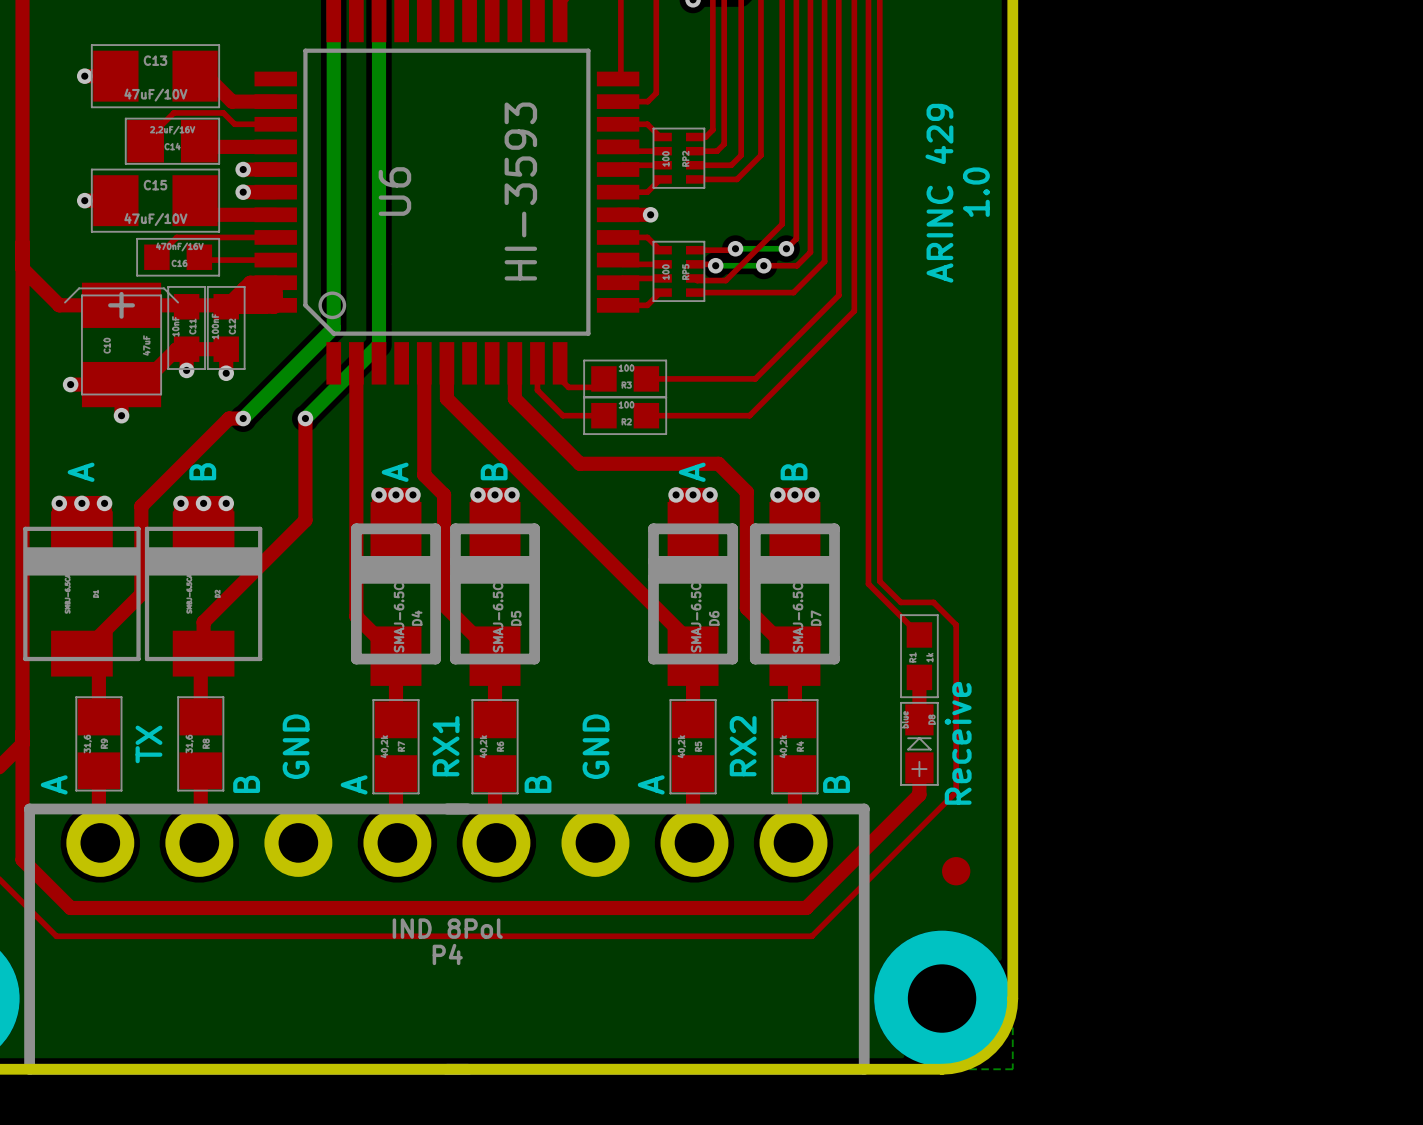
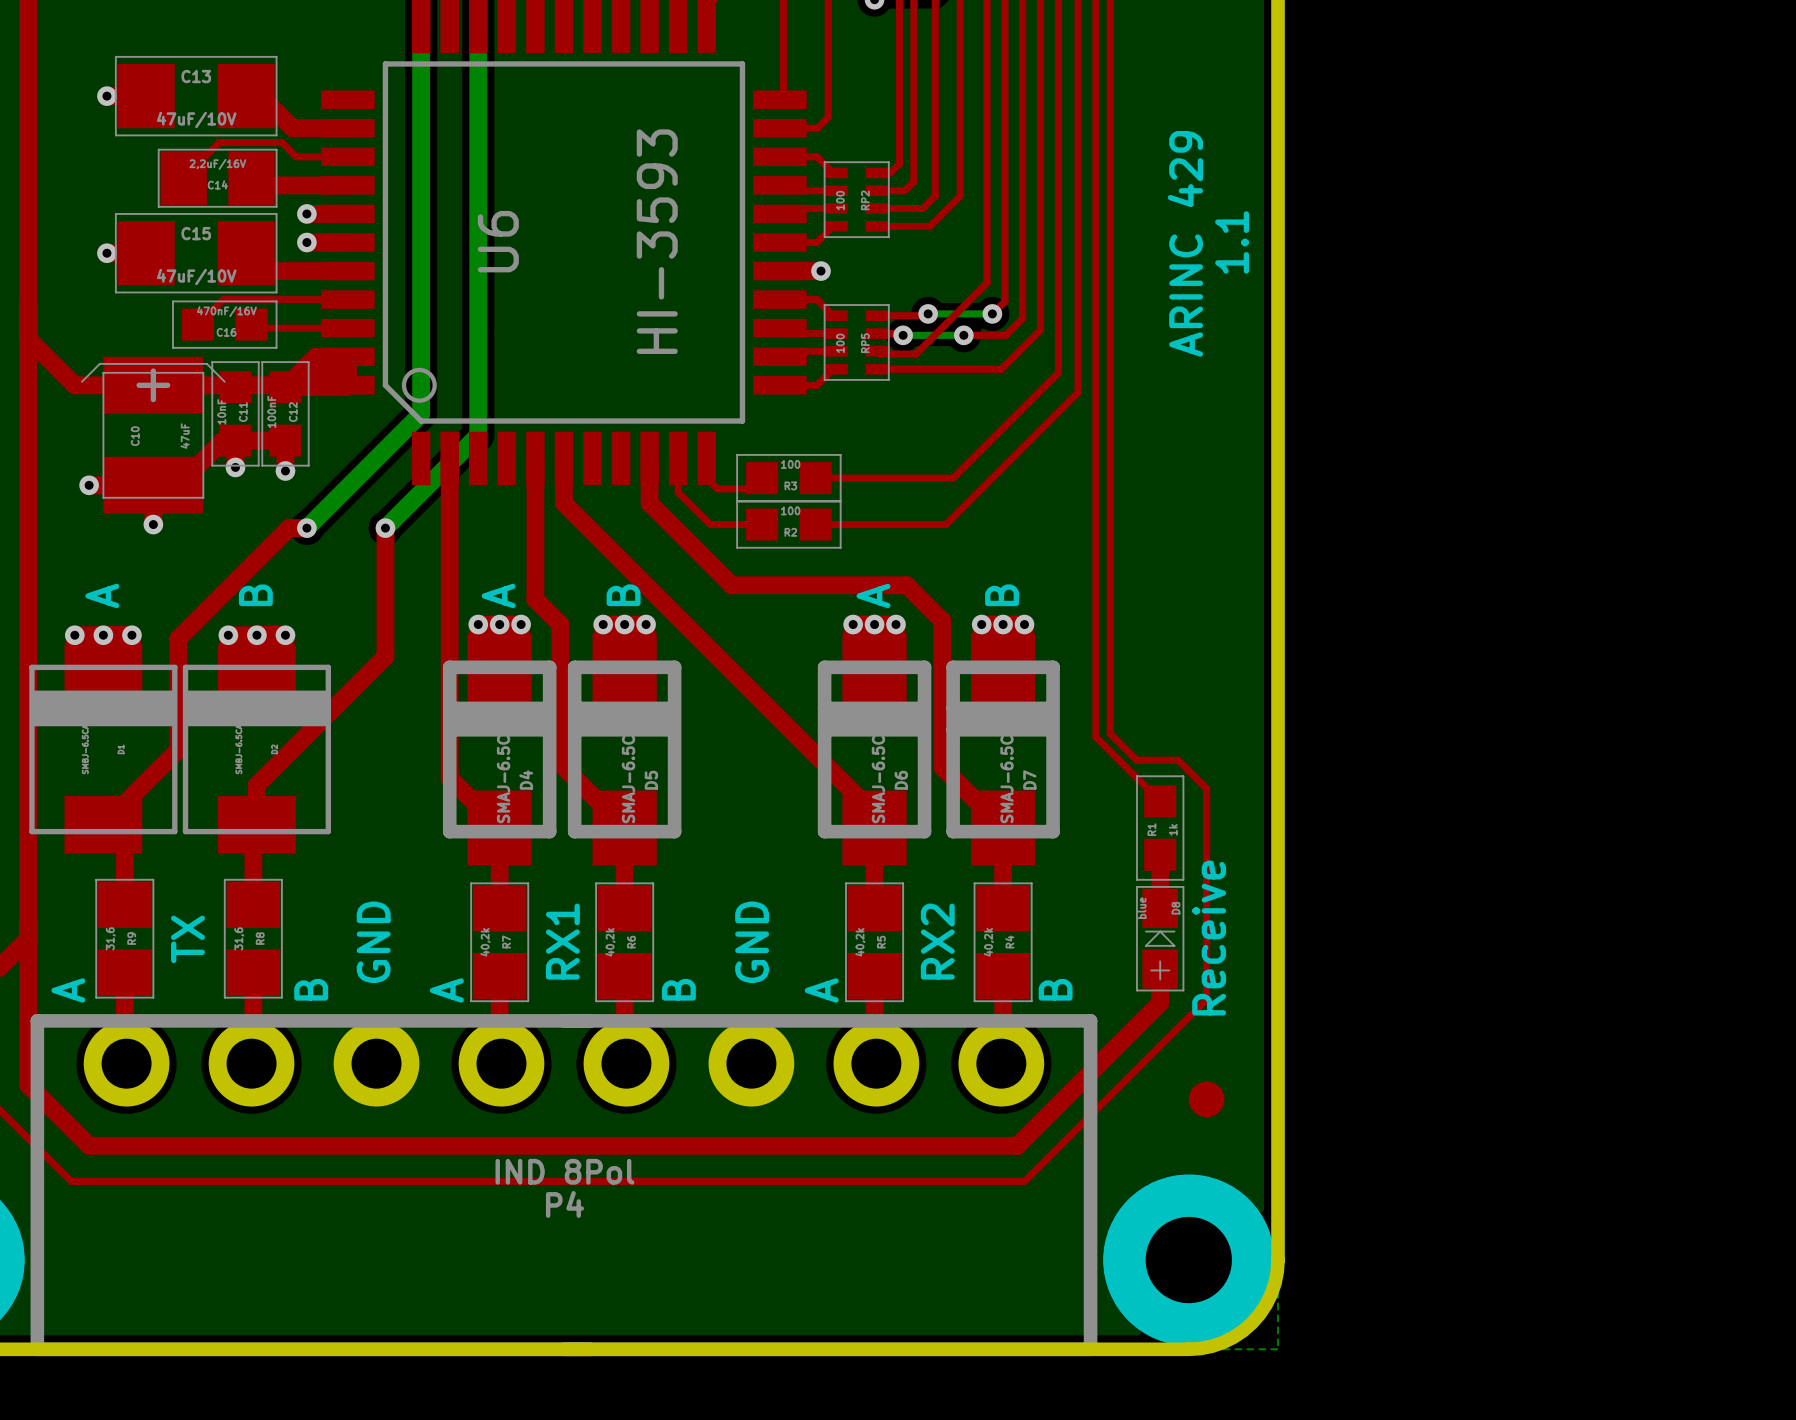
text: 1.0 (976, 192) -> 1.1 (1232, 242)

